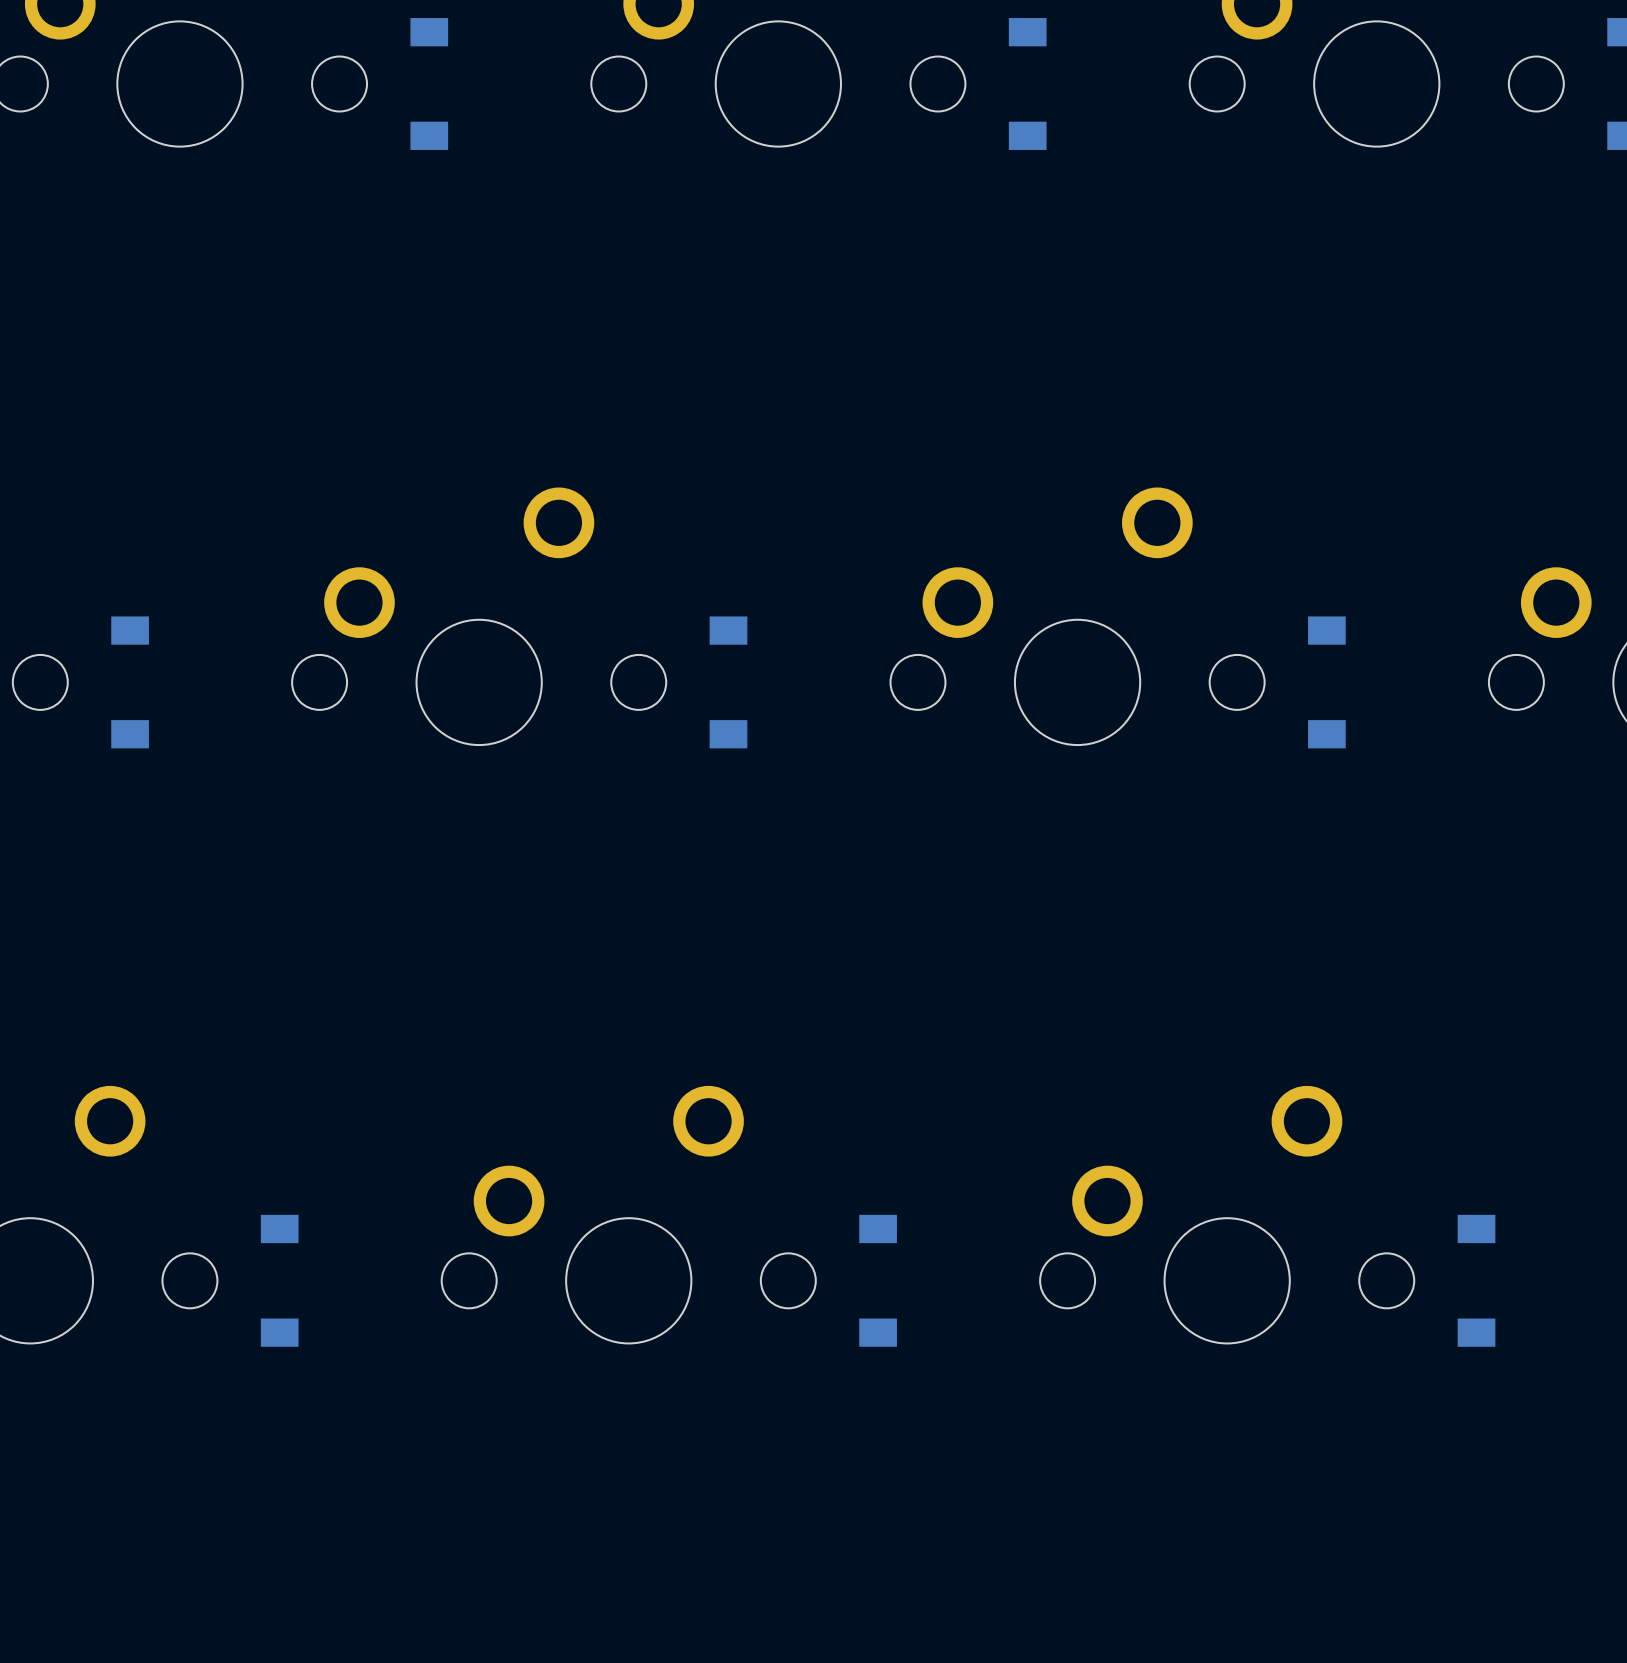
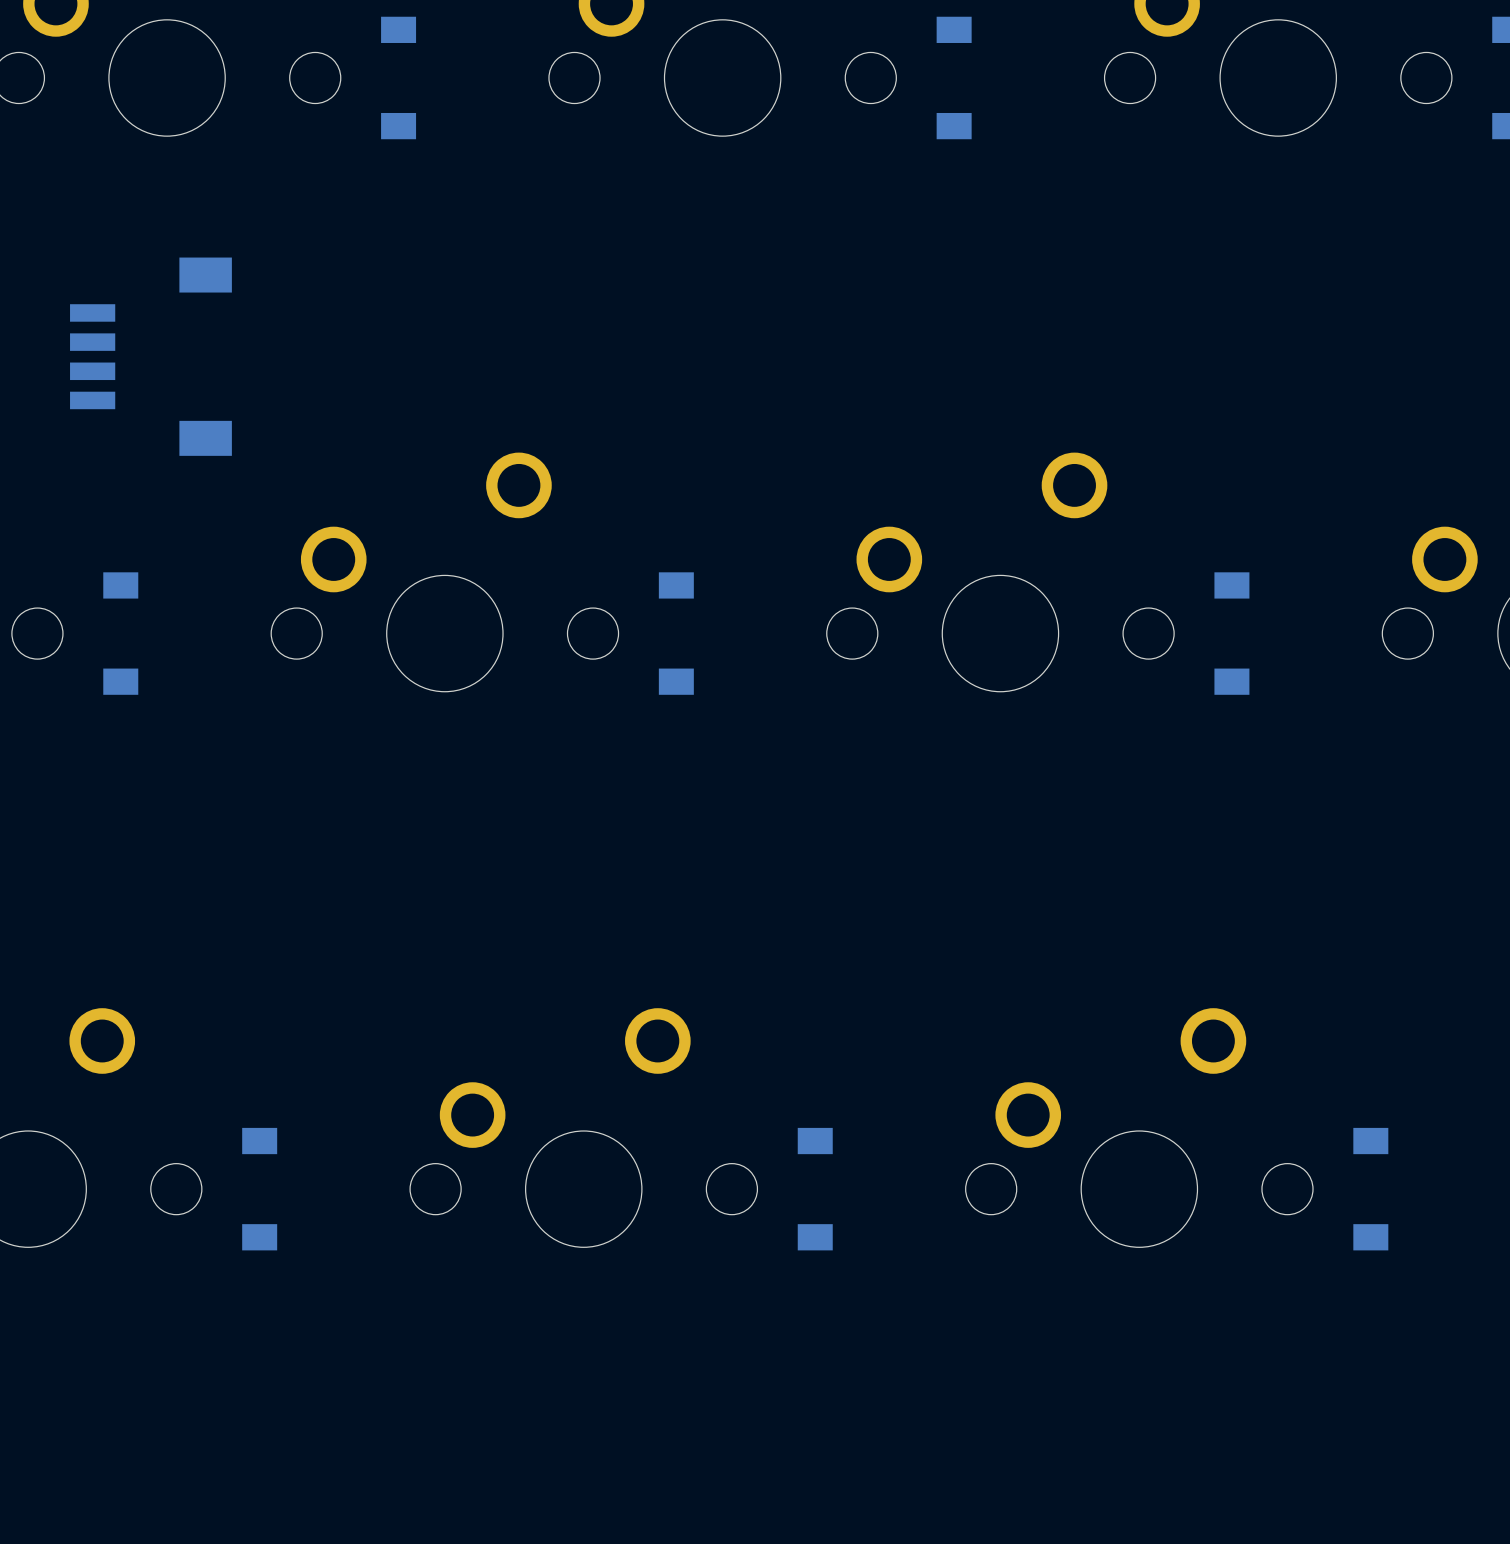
part: none -> (150, 356)

